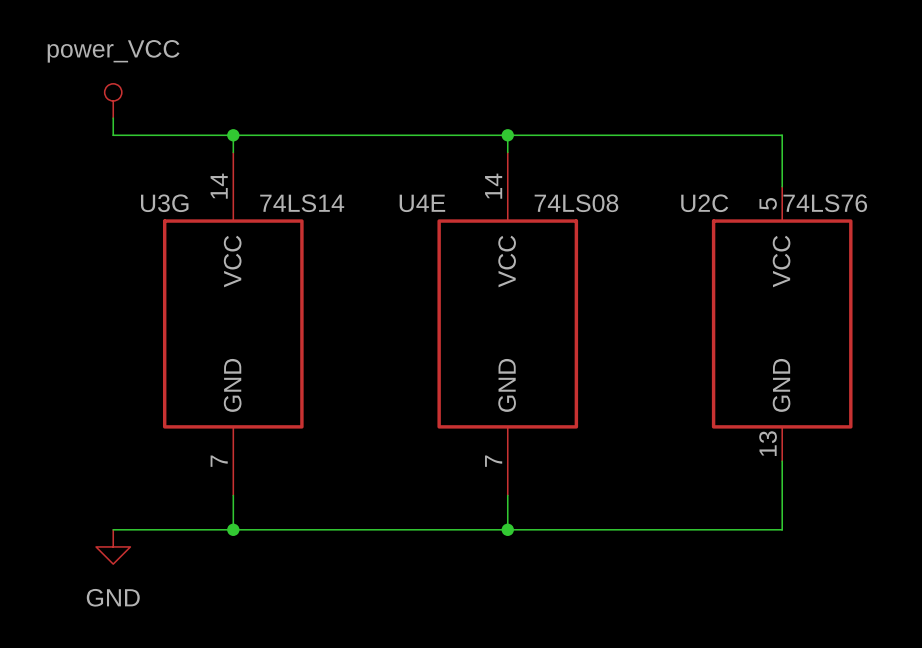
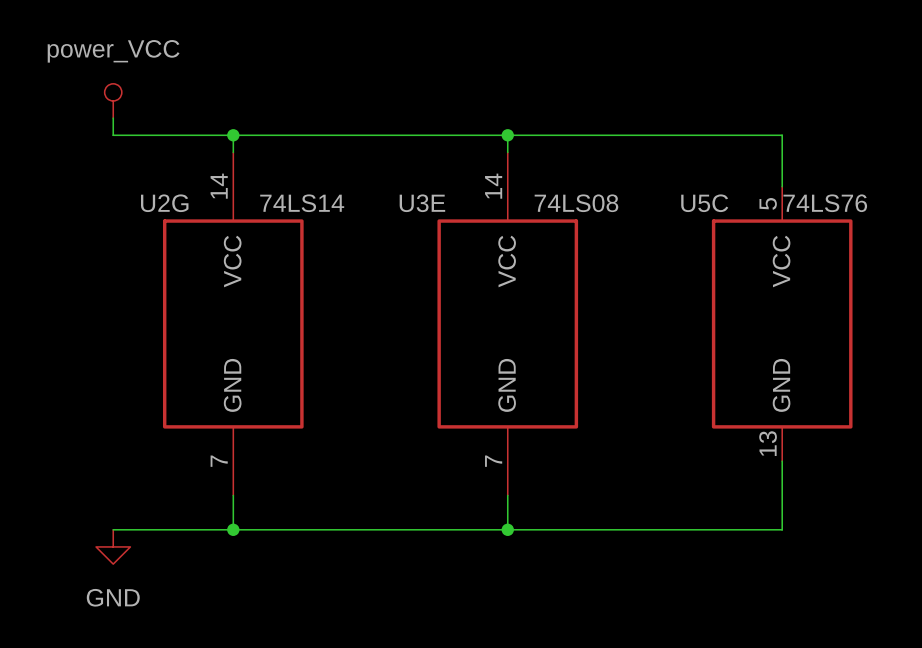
U3G name: U3G (164, 203) -> U2G (164, 203)
U4E name: U4E (422, 203) -> U3E (422, 203)
U2C name: U2C (704, 203) -> U5C (704, 203)

